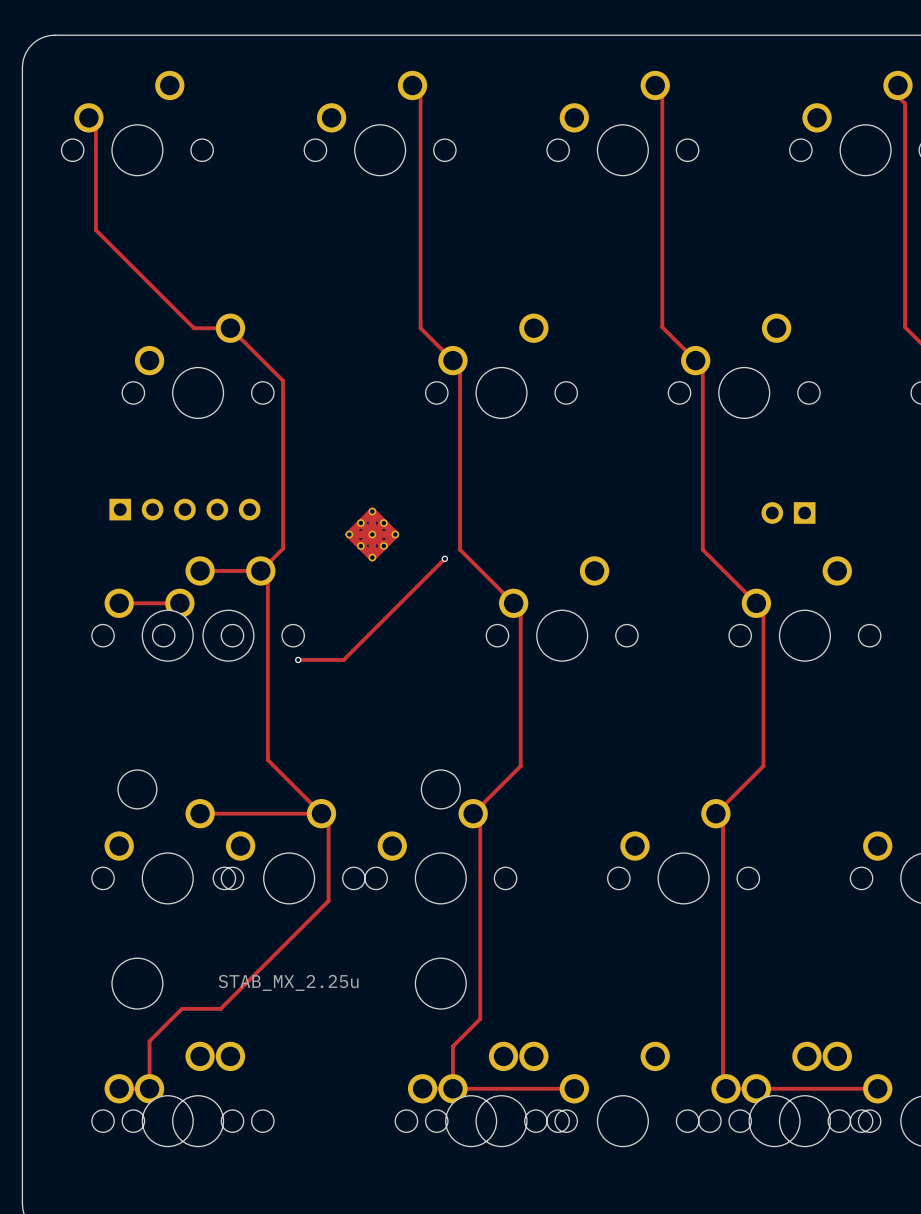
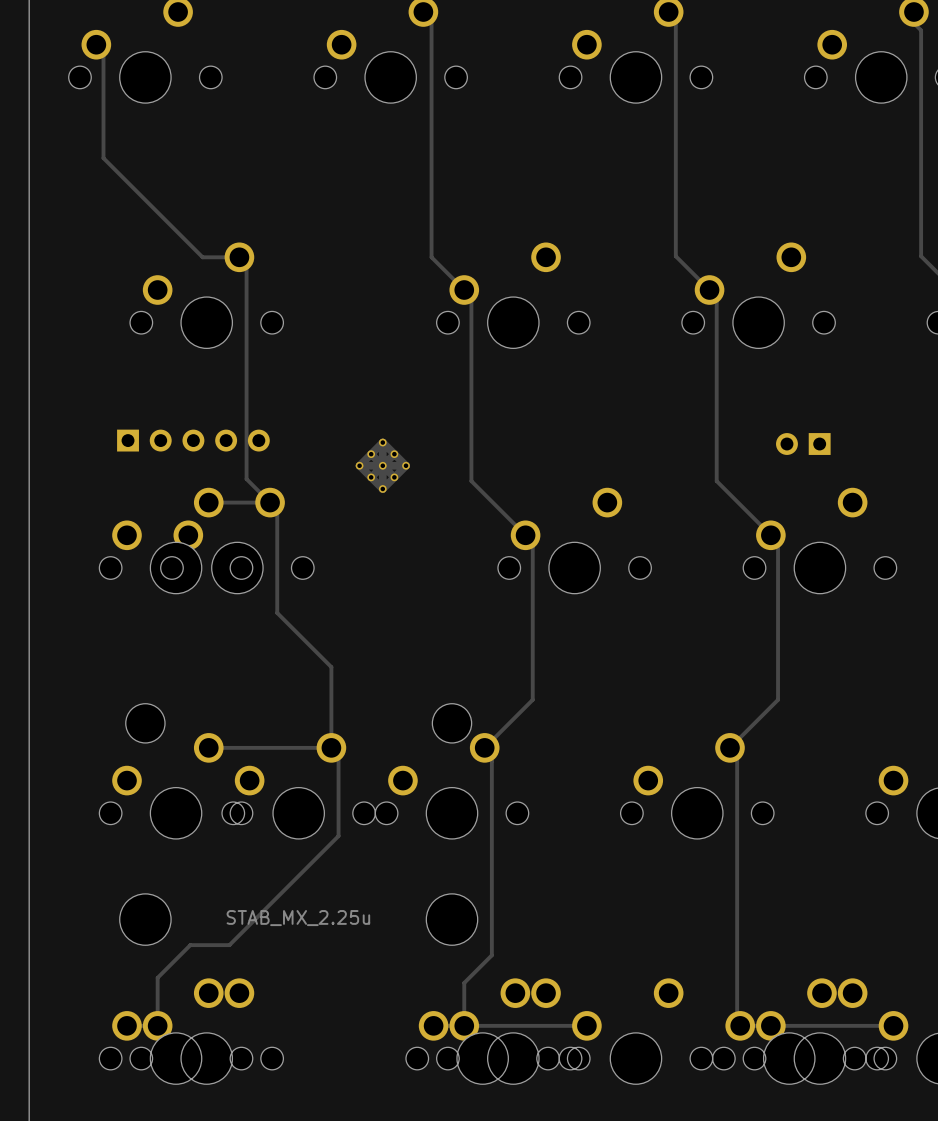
track: (230, 328) (283, 380) (283, 548) (260, 570) -> (239, 257) (246, 265) (246, 479) (270, 502)
track: (444, 558) (343, 659) (298, 659) -> none
via: (444, 558) -> none
track: (119, 603) (179, 603) -> none
via: (298, 659) -> none
track: (267, 680) (267, 760) (321, 813) -> (277, 612) (331, 667) (331, 747)

